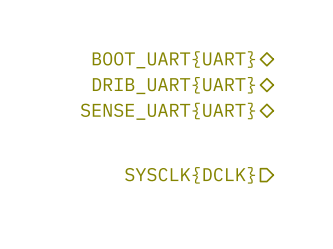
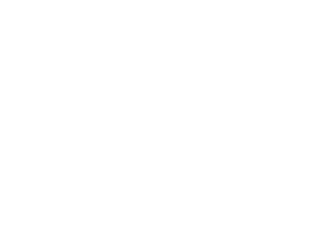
hierarchical label: BOOT_UART{UART} (173, 59) -> none
hierarchical label: DRIB_UART{UART} (173, 85) -> none
hierarchical label: SENSE_UART{UART} (167, 111) -> none
hierarchical label: SYSCLK{DCLK} (190, 175) -> none

